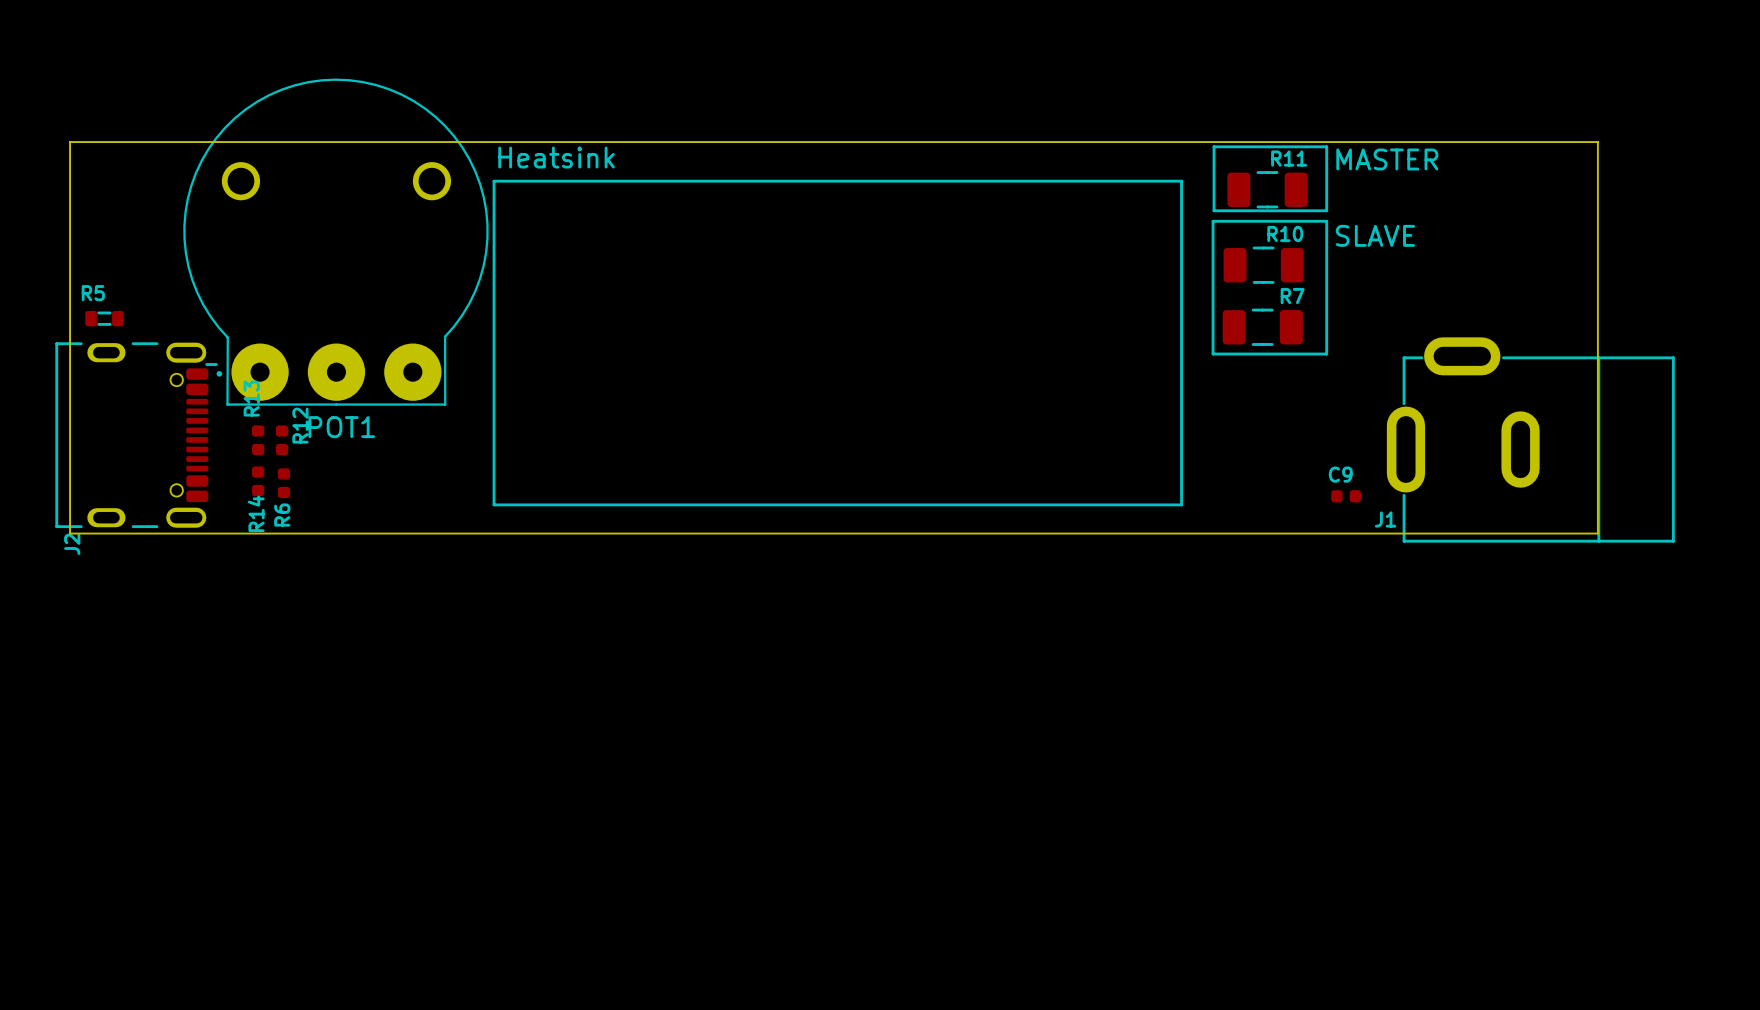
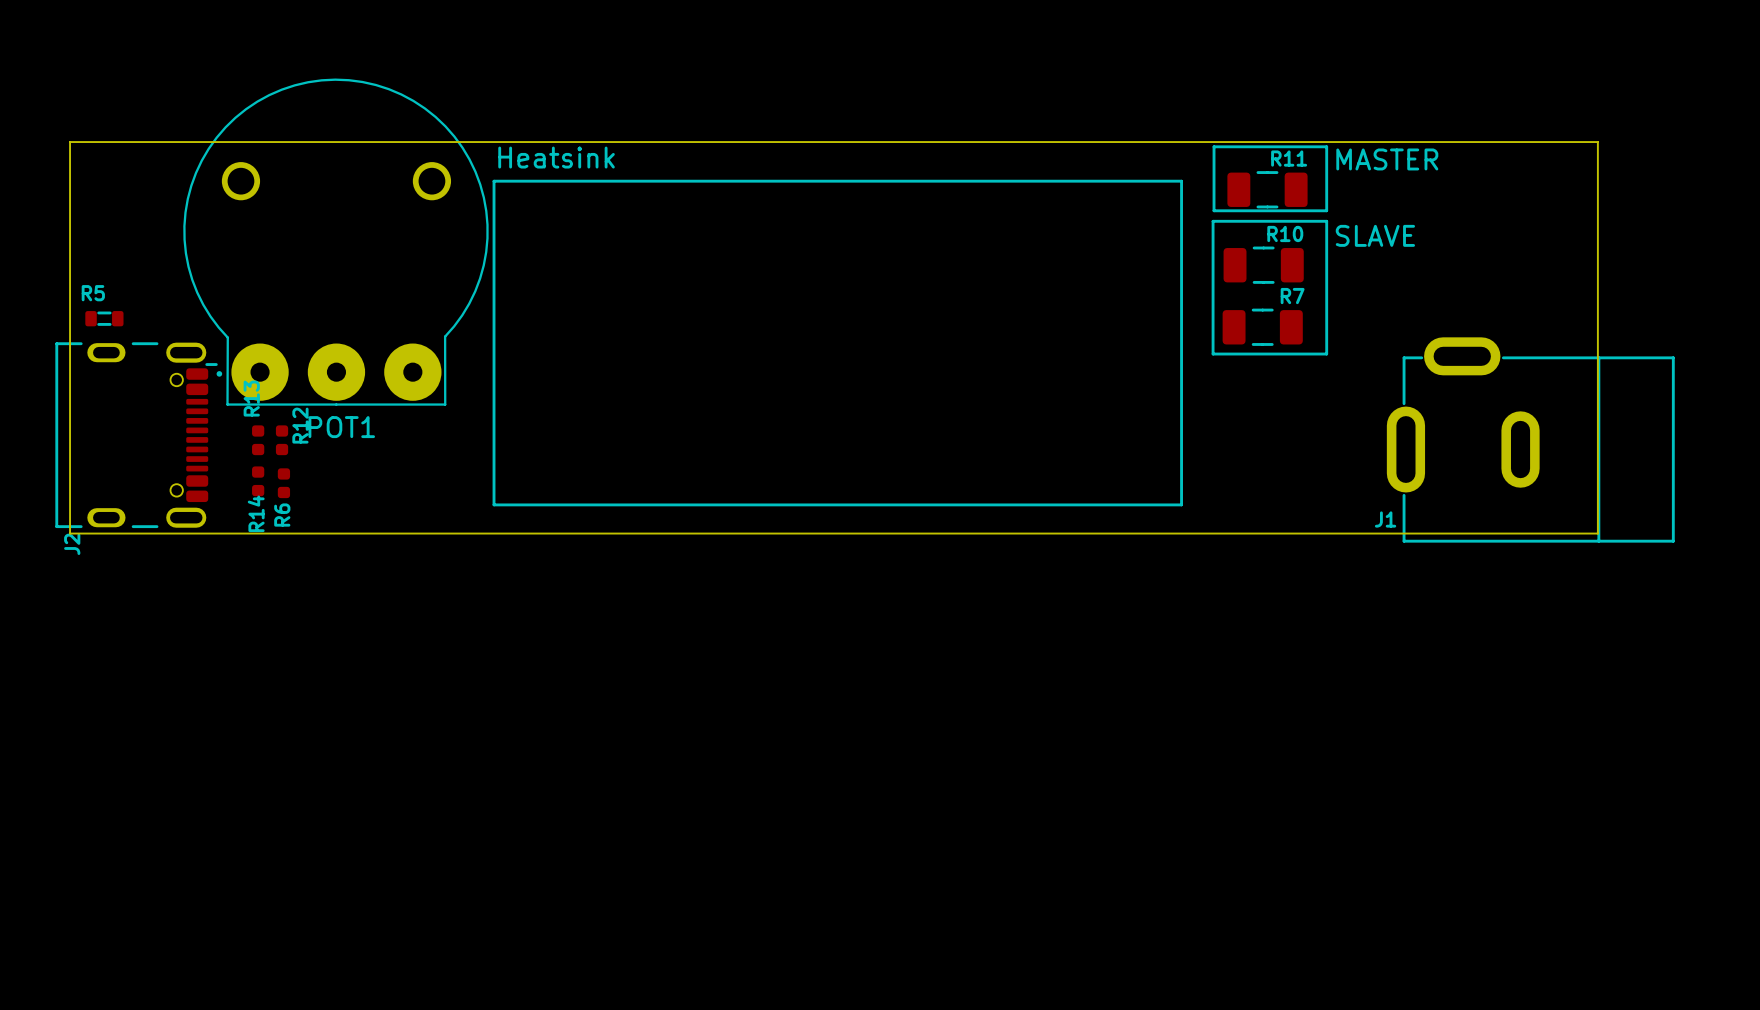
C9: (1346, 496) -> none

